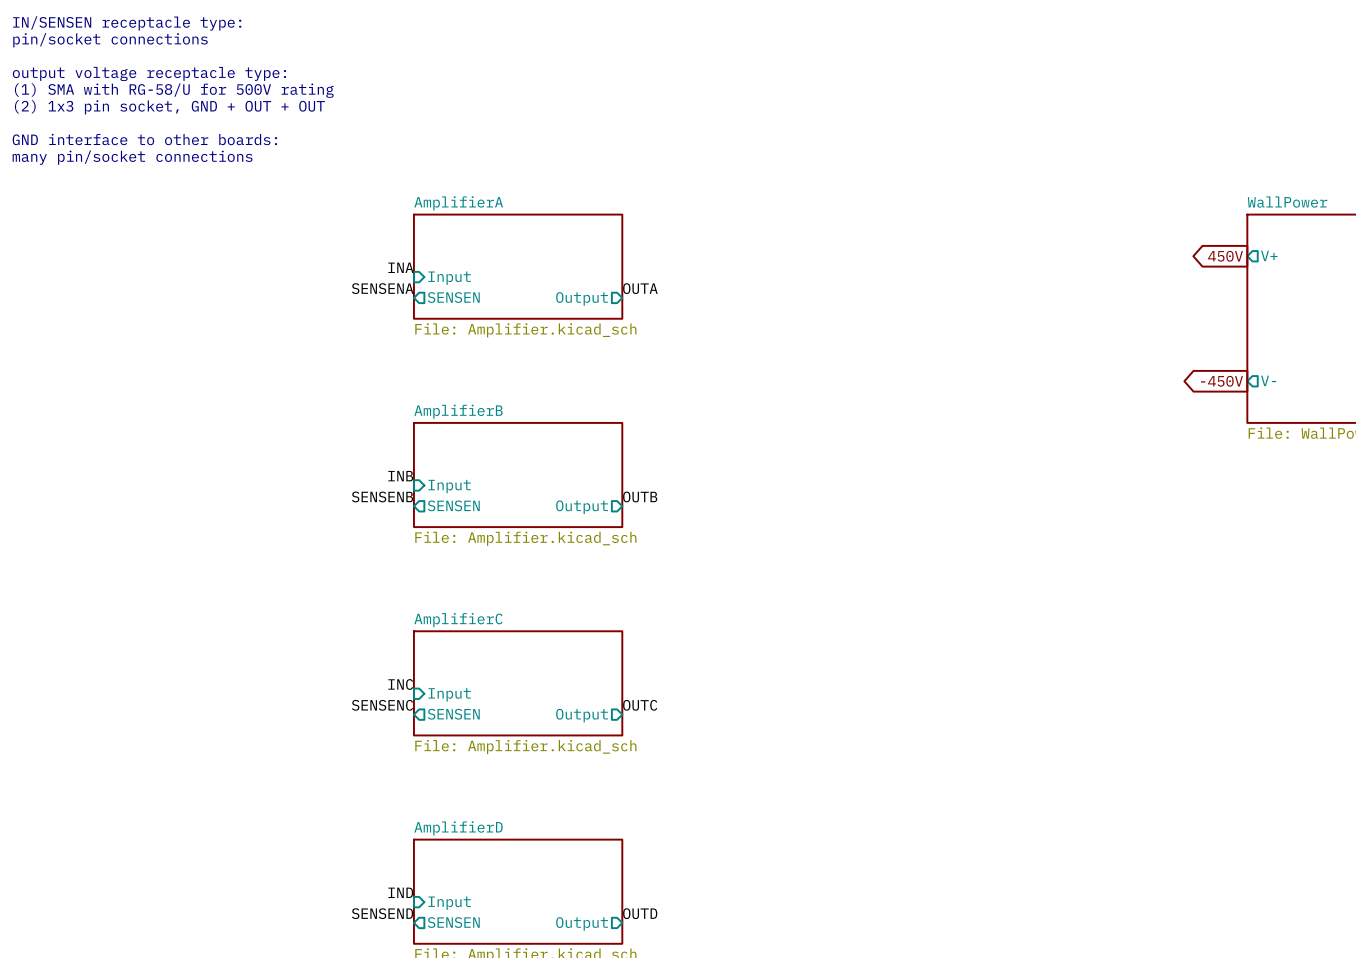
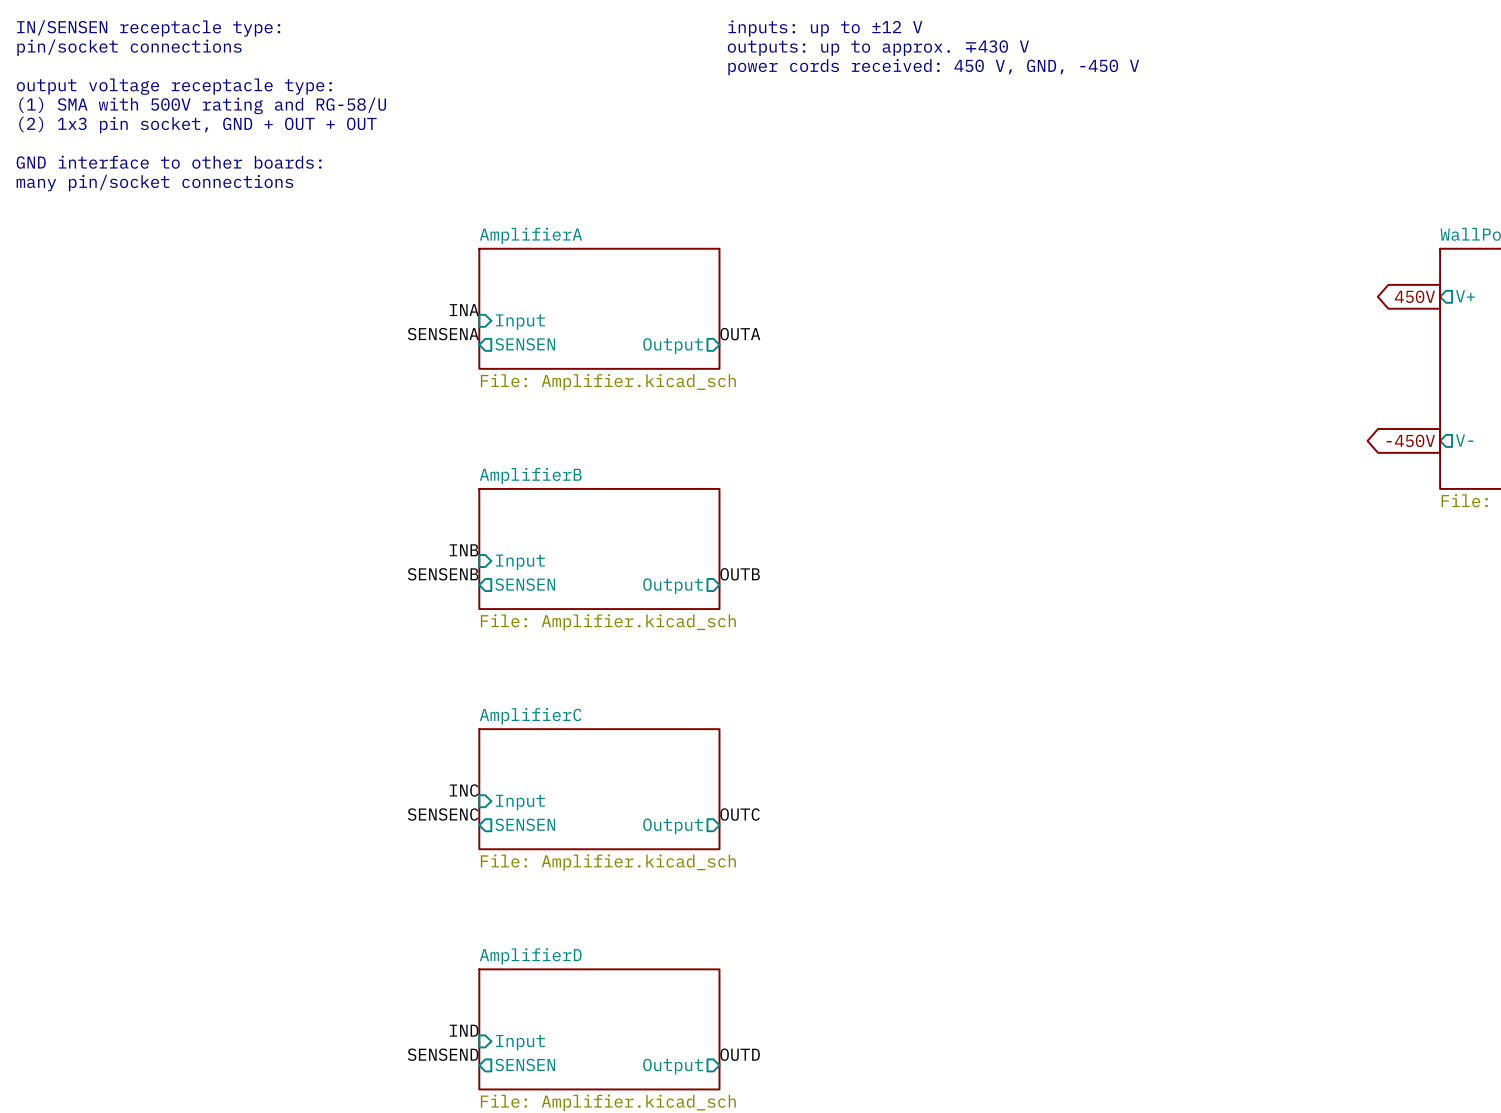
text: none -> inputs: up to ±12 V (825, 28)
text: none -> outputs: up to approx. ∓430 V (878, 48)
text: none -> power cords received: 450 V, GND, -450 V (933, 67)
text: (1) SMA with RG-58/U for 500V rating (174, 90) -> (1) SMA with 500V rating and RG-58/U (202, 105)

